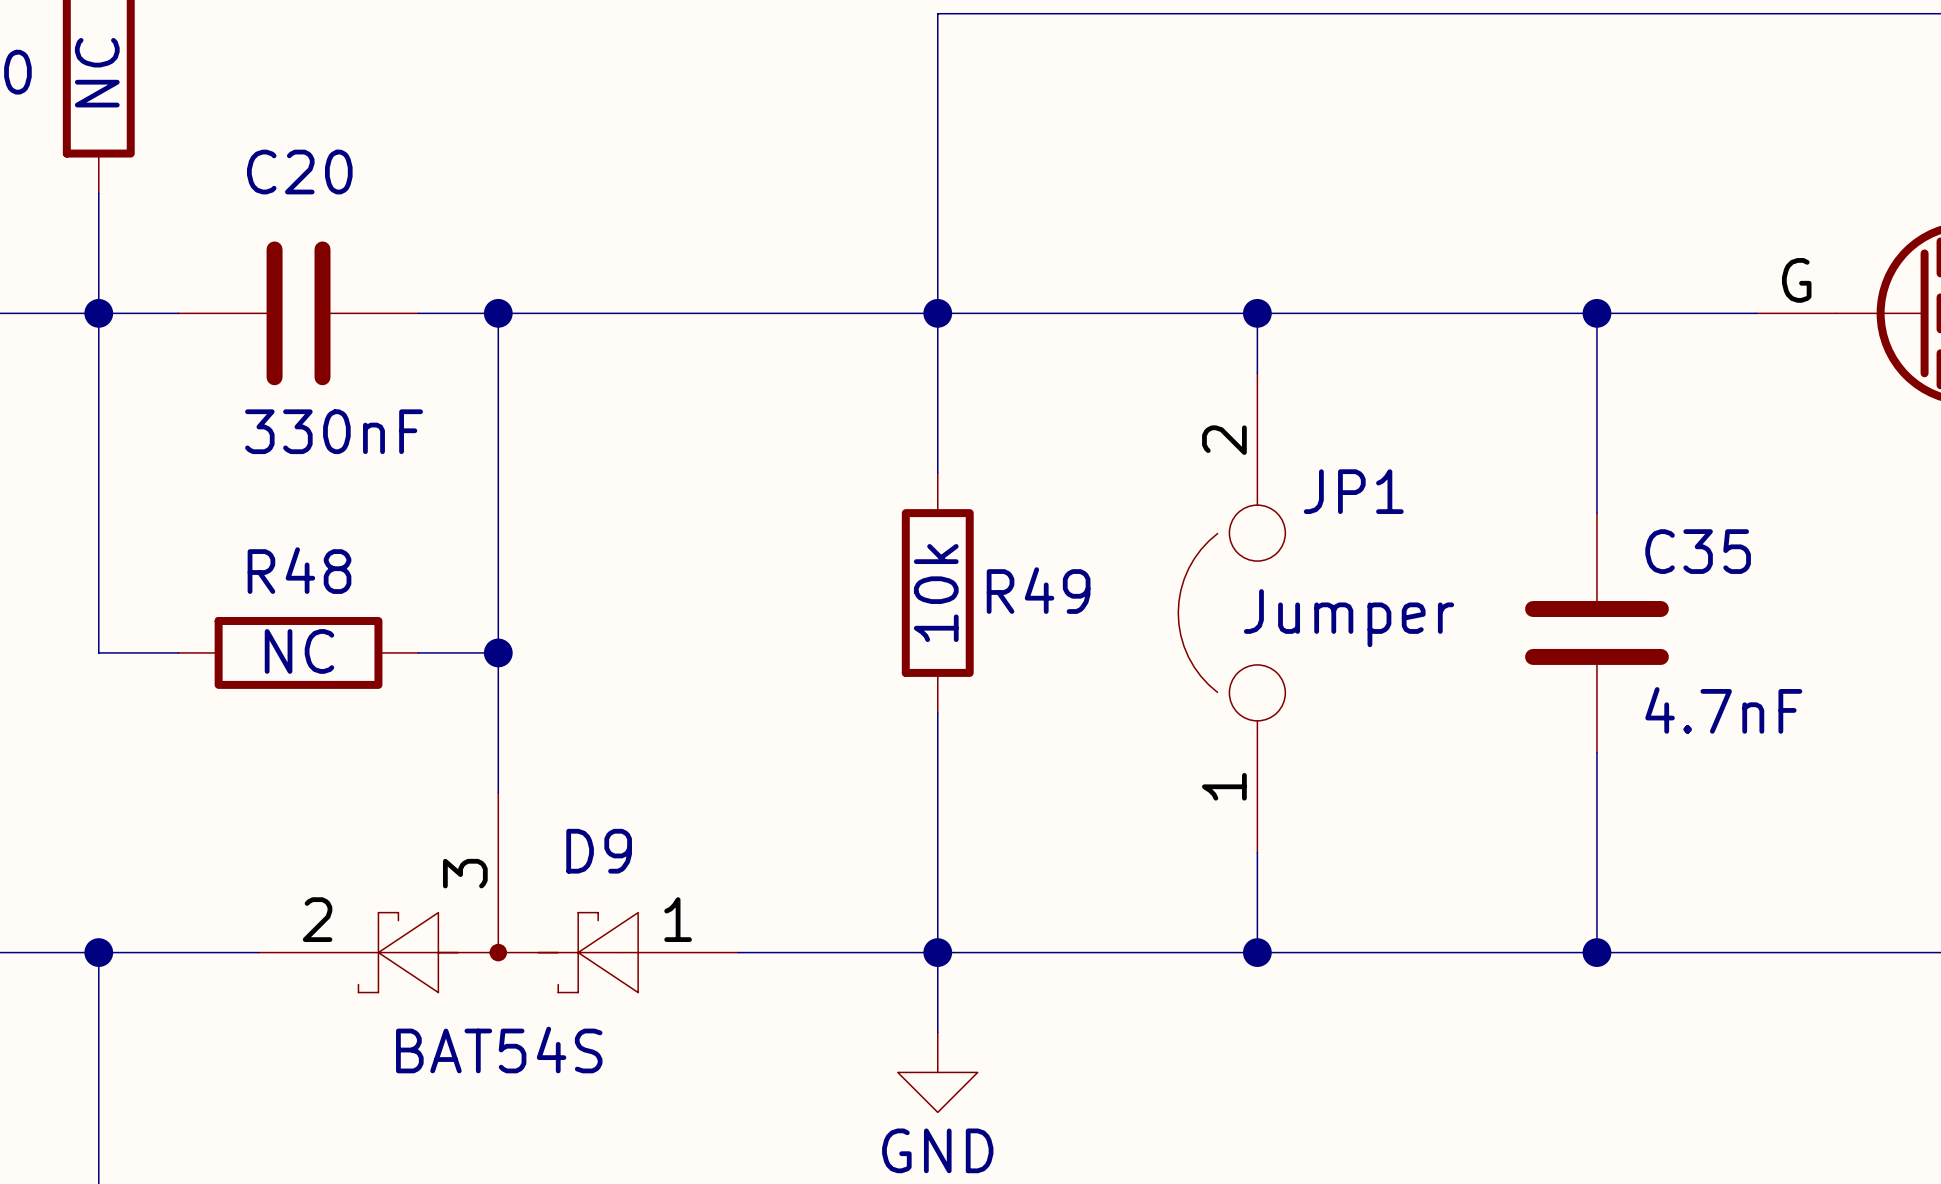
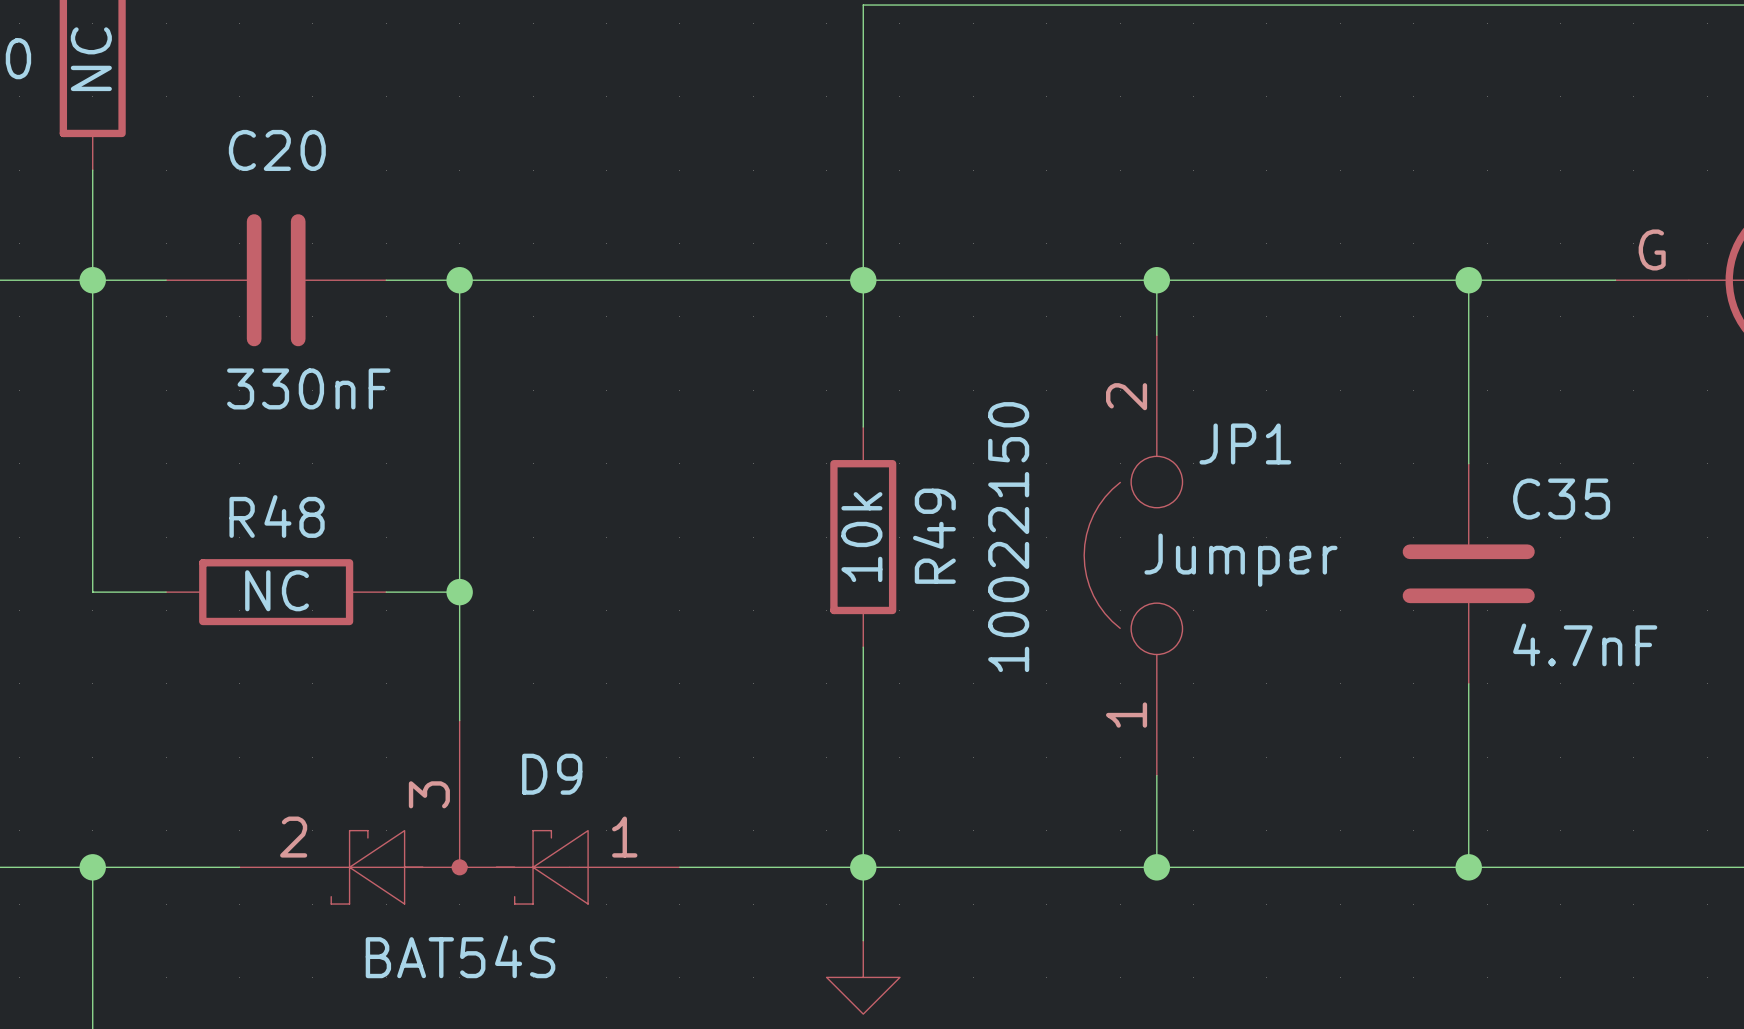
R49 name rotation: 0° (1038, 590) -> 90° counterclockwise (934, 536)
R49 text: none -> 10022150 (1008, 537)

